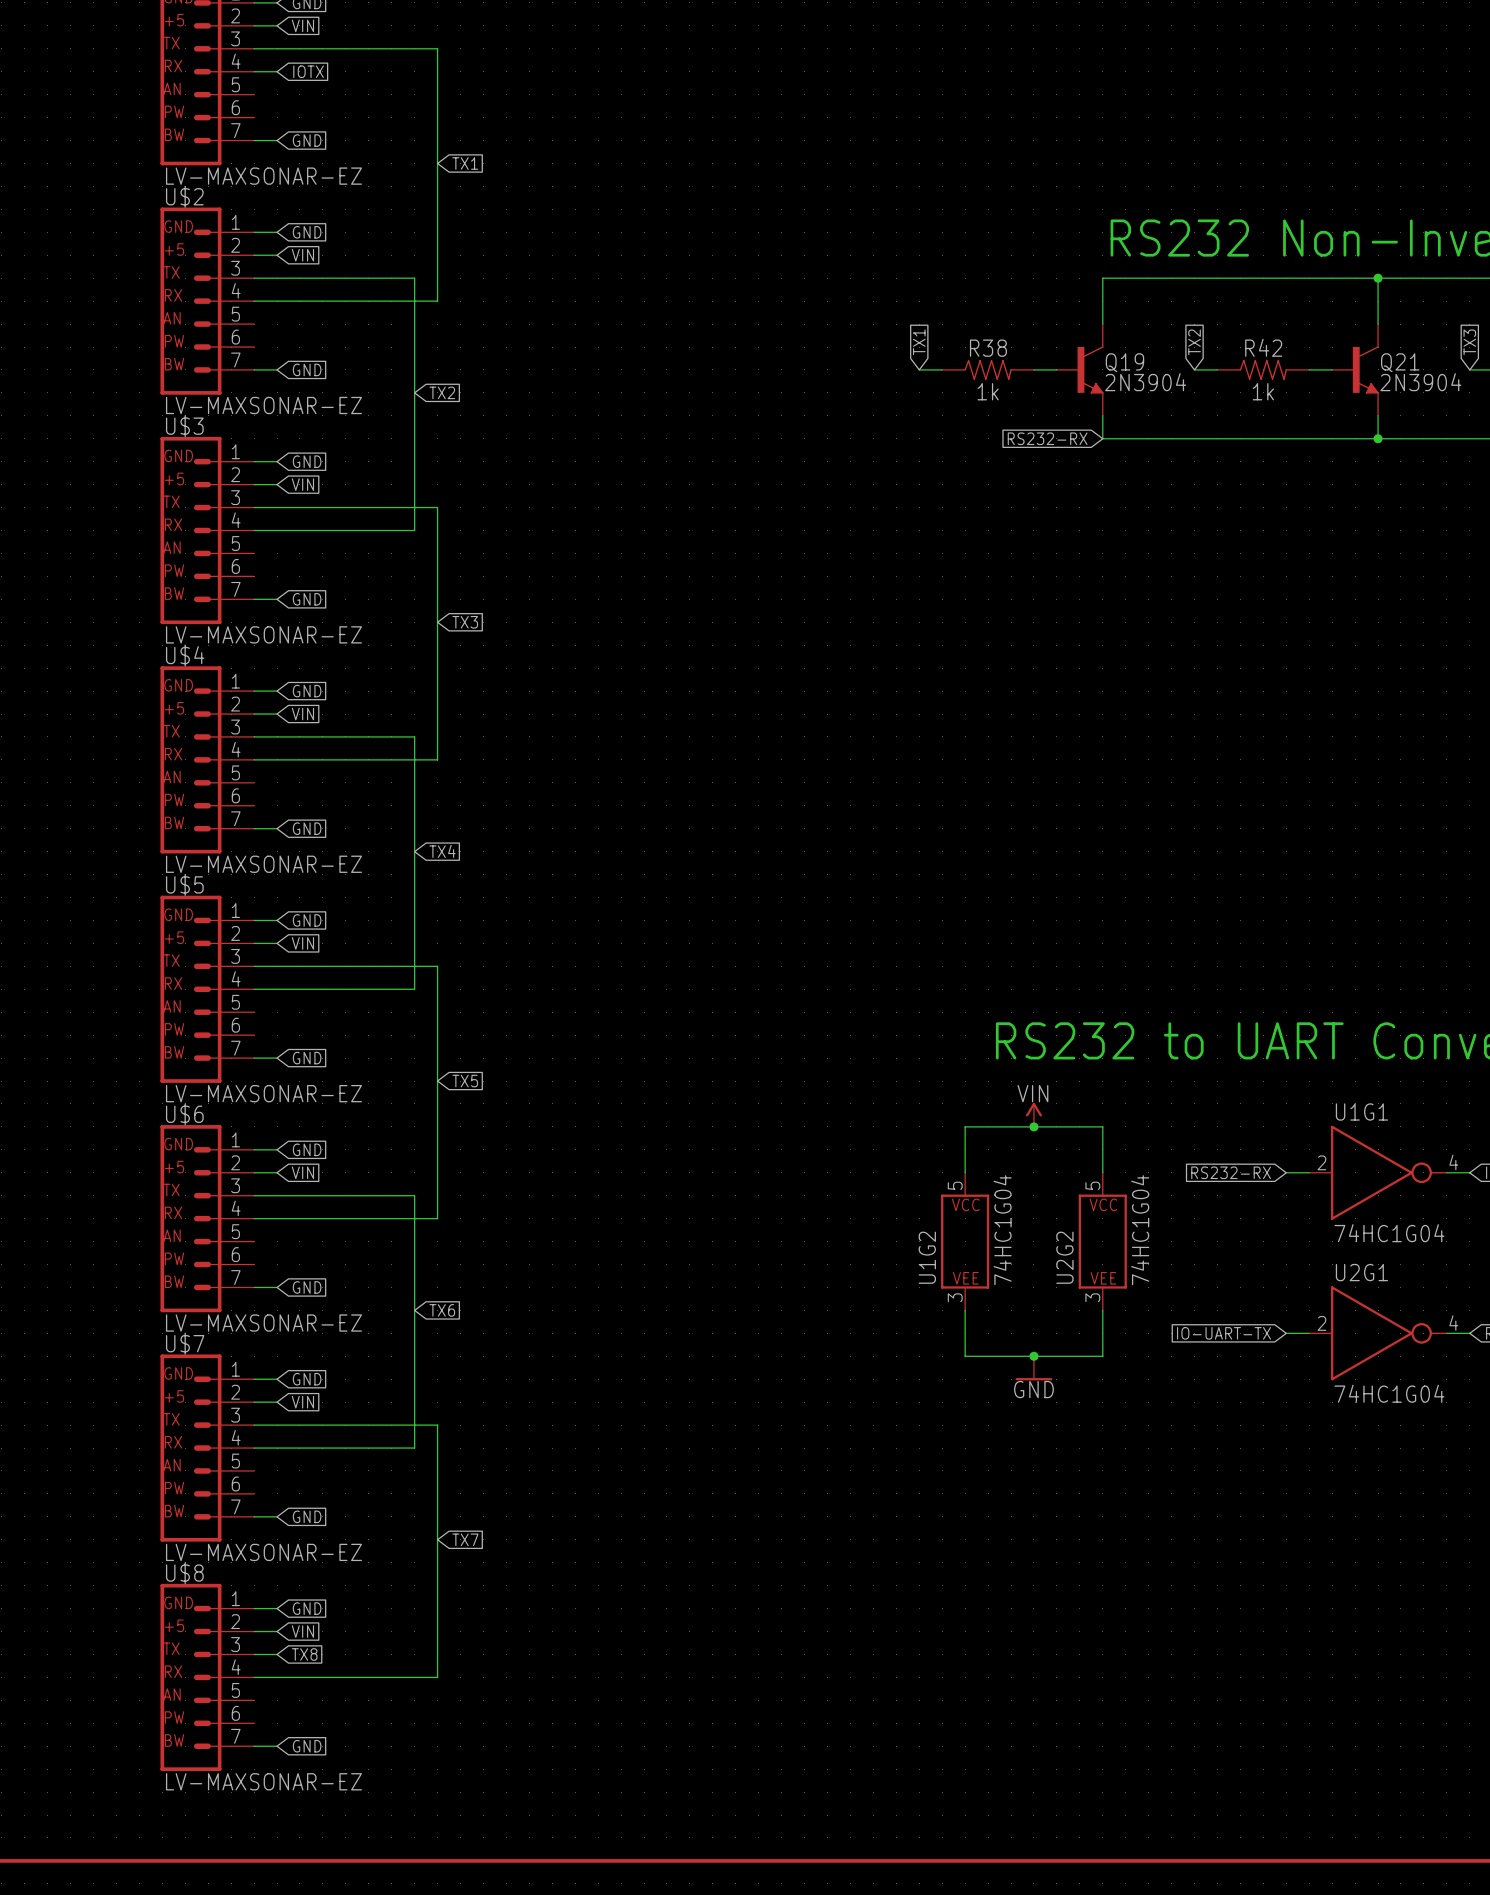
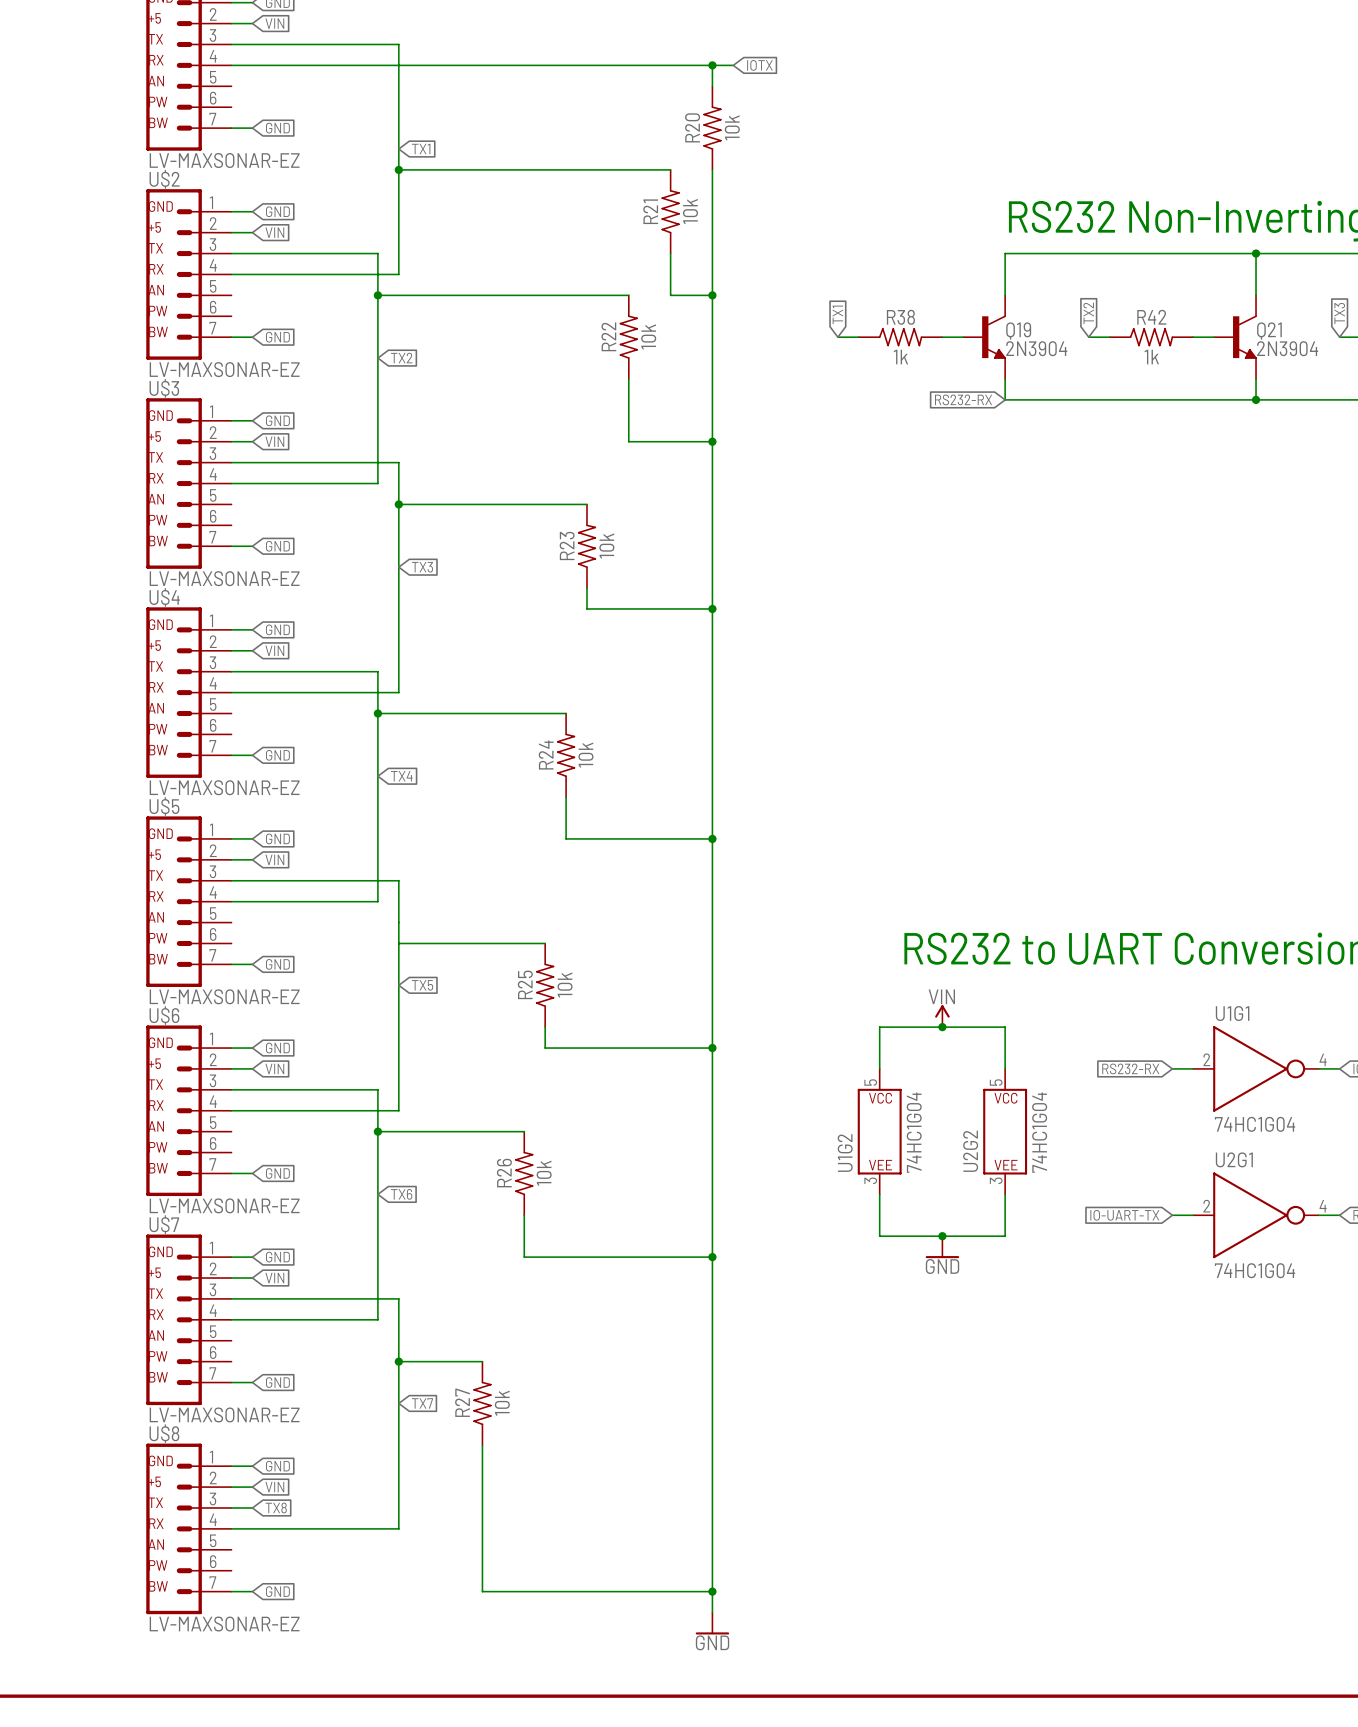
wire: none -> (252, 65) (733, 65)
global label: IOTX (308, 71) -> none
wire: none -> (712, 65) (712, 86)
junction: none -> (712, 65)
global label: none -> IOTX (759, 65)
R20: none -> 10k (712, 128)
wire: none -> (398, 169) (670, 169)
junction: none -> (398, 169)
wire: none -> (712, 169) (712, 1612)
R21: none -> 10k (670, 211)
wire: none -> (670, 253) (670, 295) (712, 295)
wire: none -> (377, 295) (628, 295)
junction: none -> (377, 295)
junction: none -> (712, 295)
R22: none -> 10k (628, 337)
wire: none -> (628, 379) (628, 441) (712, 441)
junction: none -> (712, 441)
wire: none -> (398, 504) (586, 504)
junction: none -> (398, 504)
R23: none -> 10k (586, 546)
wire: none -> (586, 588) (586, 608) (712, 608)
junction: none -> (712, 608)
wire: none -> (377, 713) (566, 713)
junction: none -> (377, 713)
R24: none -> 10k (566, 755)
wire: none -> (566, 797) (566, 838) (712, 838)
junction: none -> (712, 838)
wire: none -> (398, 943) (545, 943)
R25: none -> 10k (545, 985)
wire: none -> (545, 1027) (545, 1048) (712, 1048)
junction: none -> (712, 1048)
wire: none -> (377, 1131) (524, 1131)
junction: none -> (377, 1131)
R26: none -> 10k (524, 1173)
wire: none -> (524, 1215) (524, 1257) (712, 1257)
junction: none -> (712, 1257)
wire: none -> (398, 1361) (482, 1361)
junction: none -> (398, 1361)
R27: none -> 10k (482, 1403)
wire: none -> (482, 1445) (482, 1591) (712, 1591)
junction: none -> (712, 1591)
power symbol: none -> GND (712, 1623)

